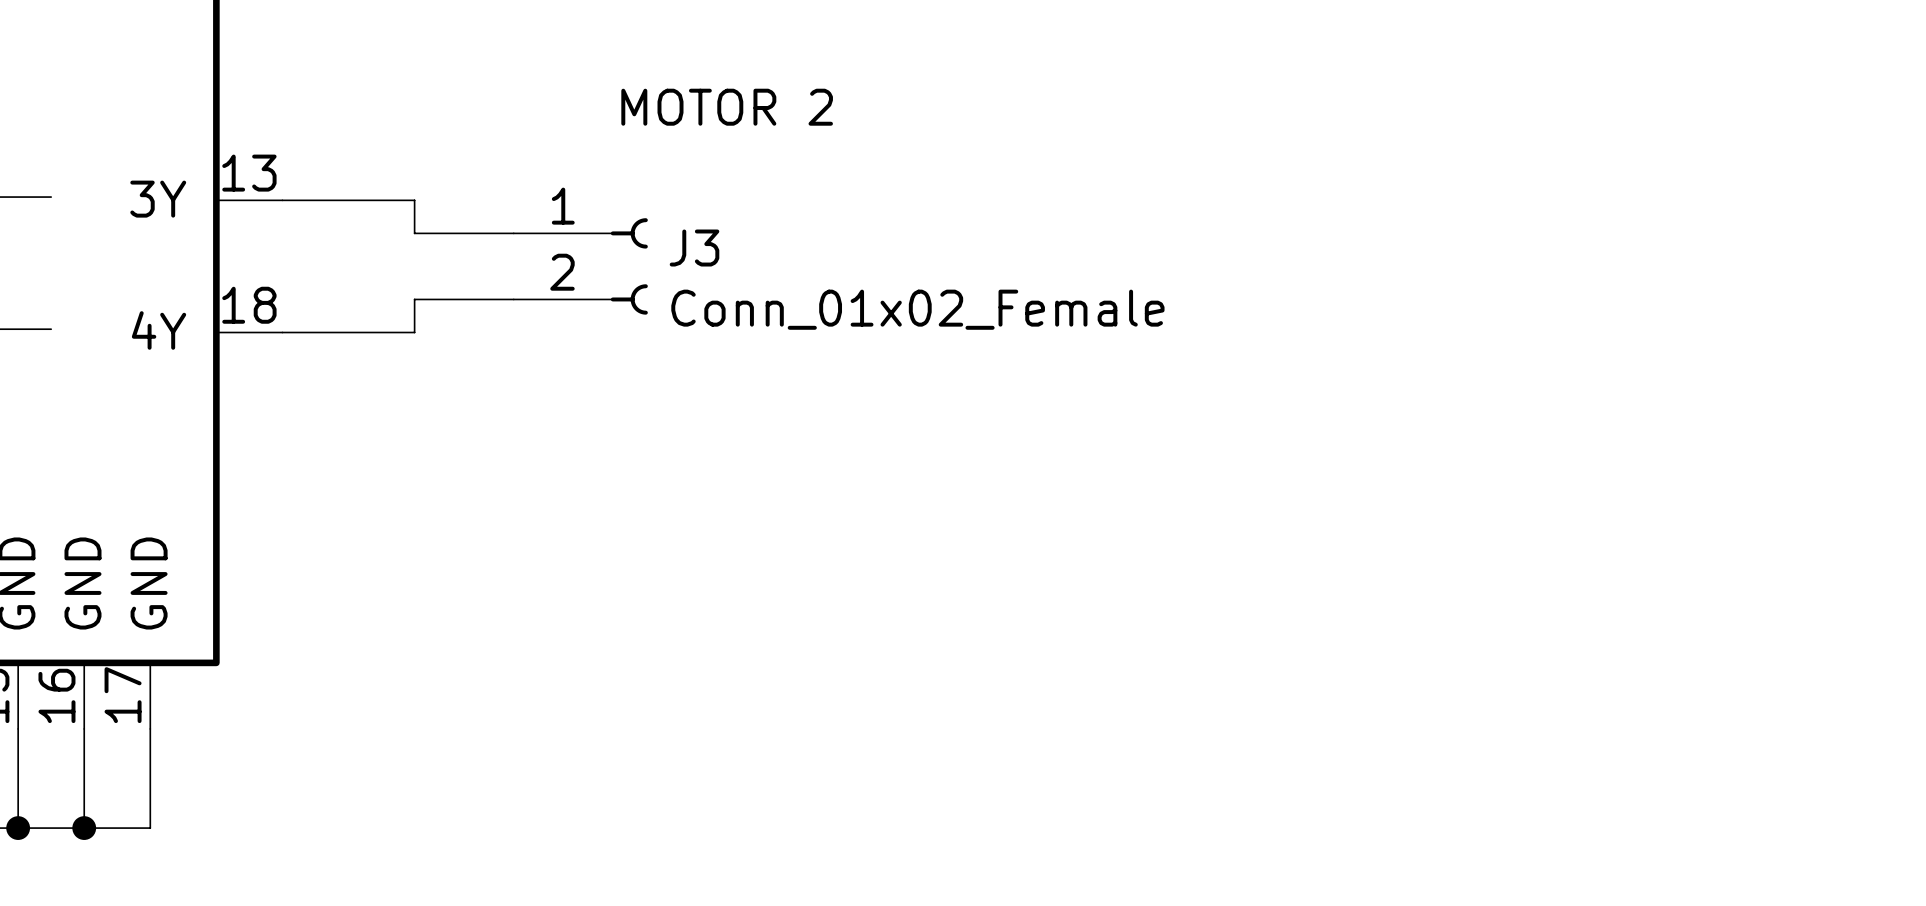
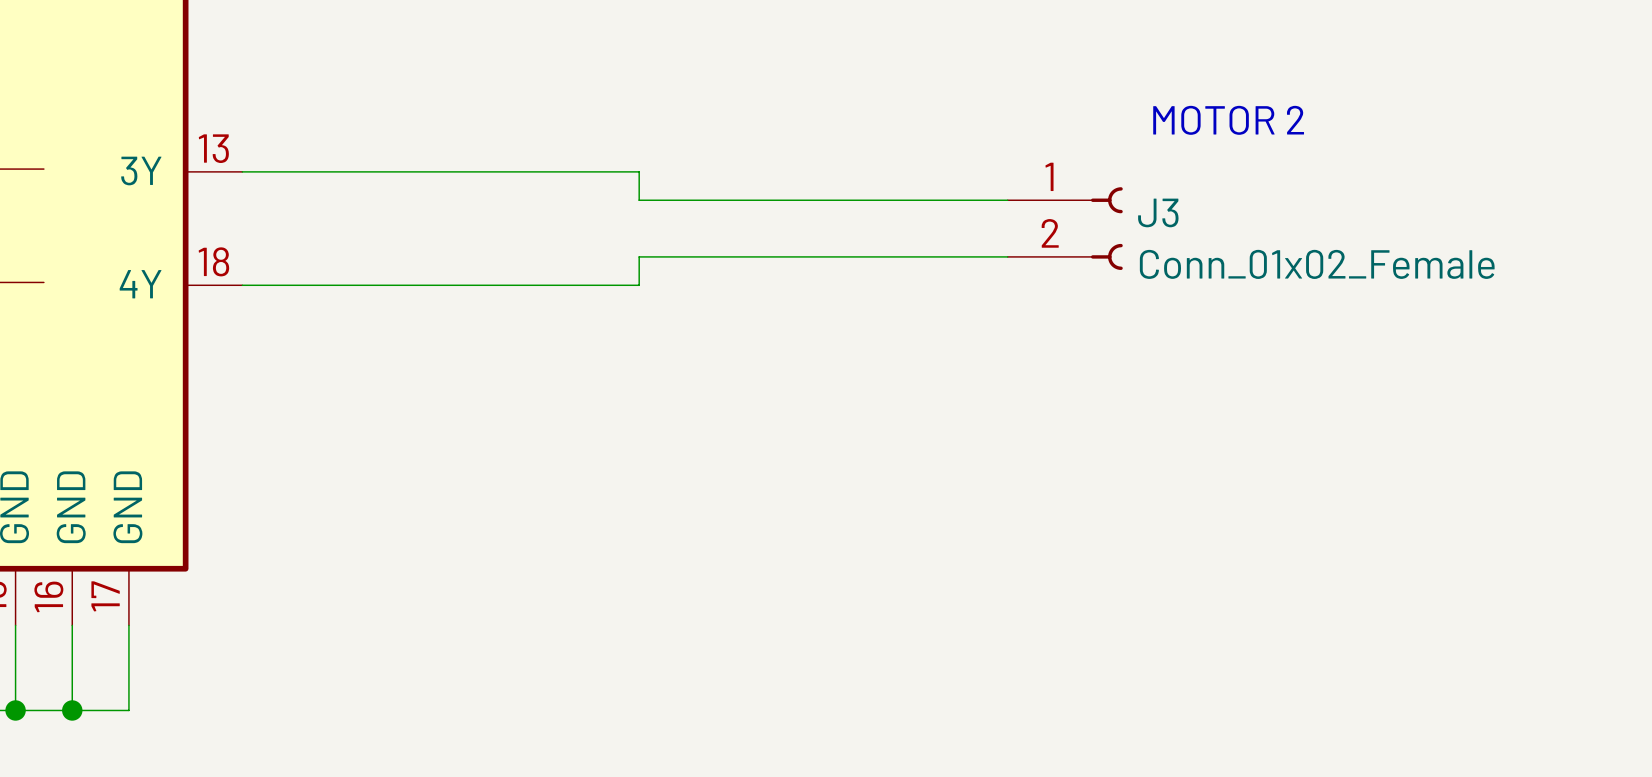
text: MOTOR 2 (727, 107) -> none
text: none -> MOTOR 2 (1228, 120)
wire: (414, 200) (414, 233) (513, 233) -> (355, 171) (639, 171) (639, 200) (1007, 200)
J3 position: (580, 266) -> (1065, 228)
wire: (513, 299) (414, 299) (414, 332) -> (1007, 256) (639, 256) (639, 285) (355, 285)

